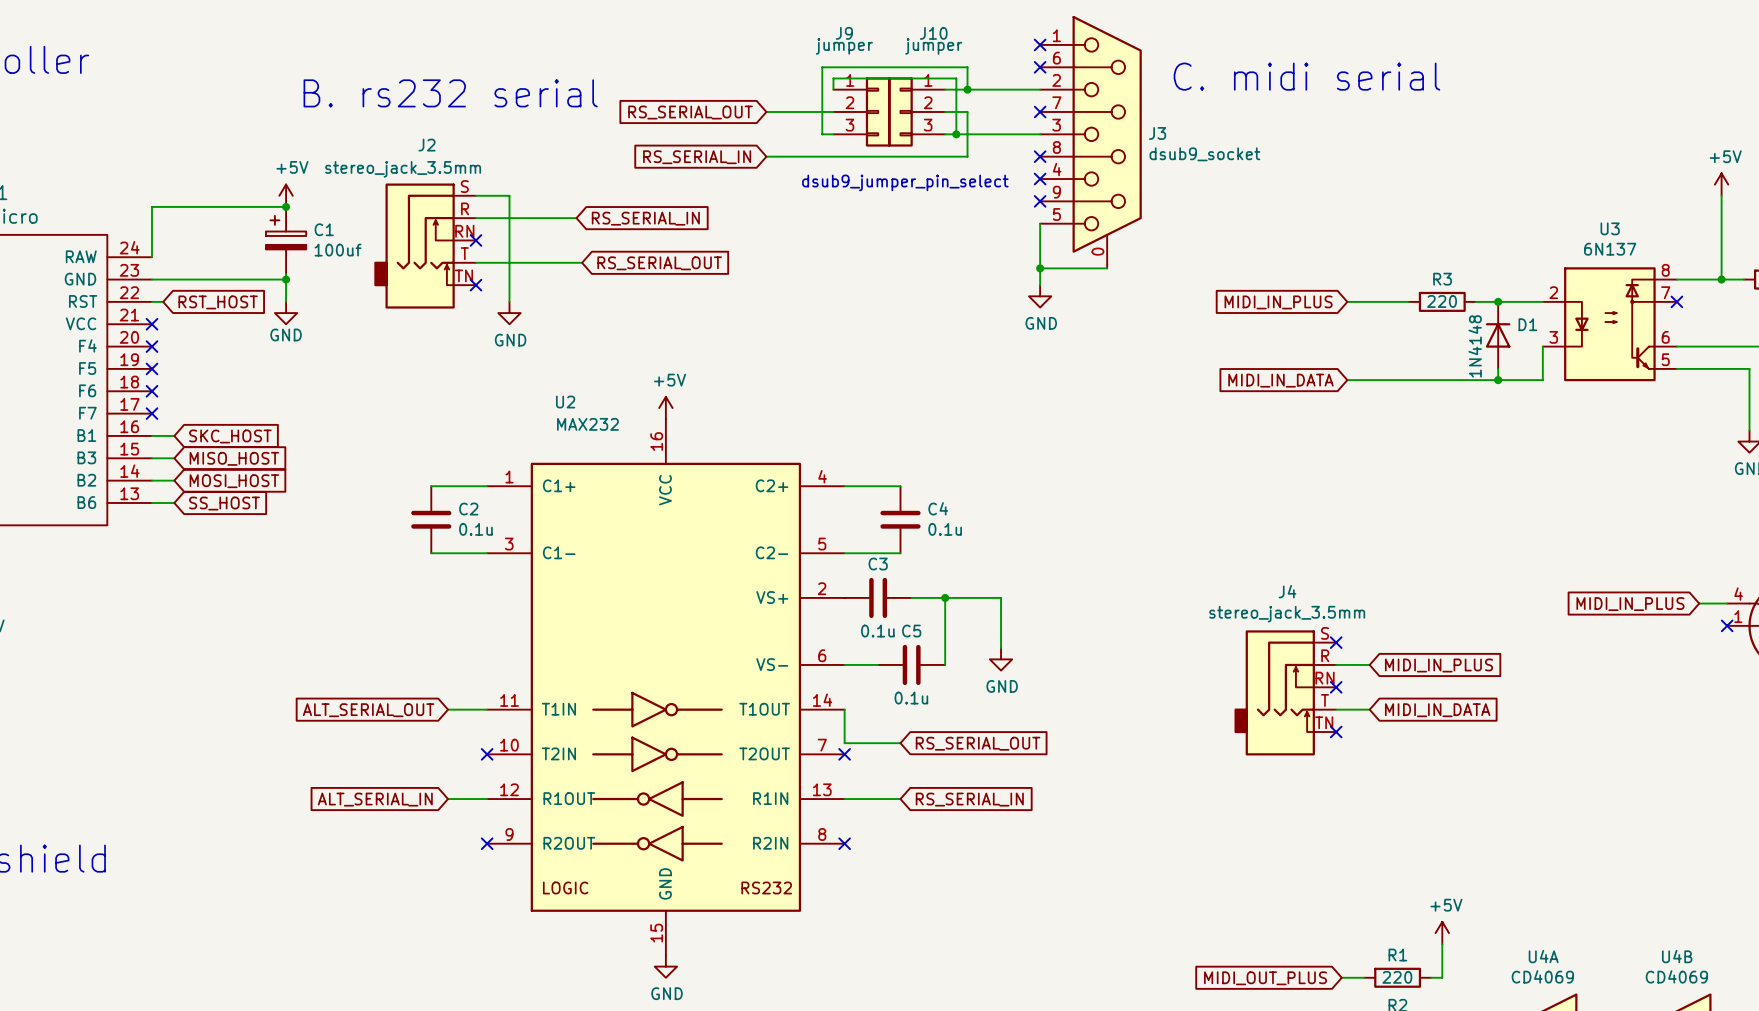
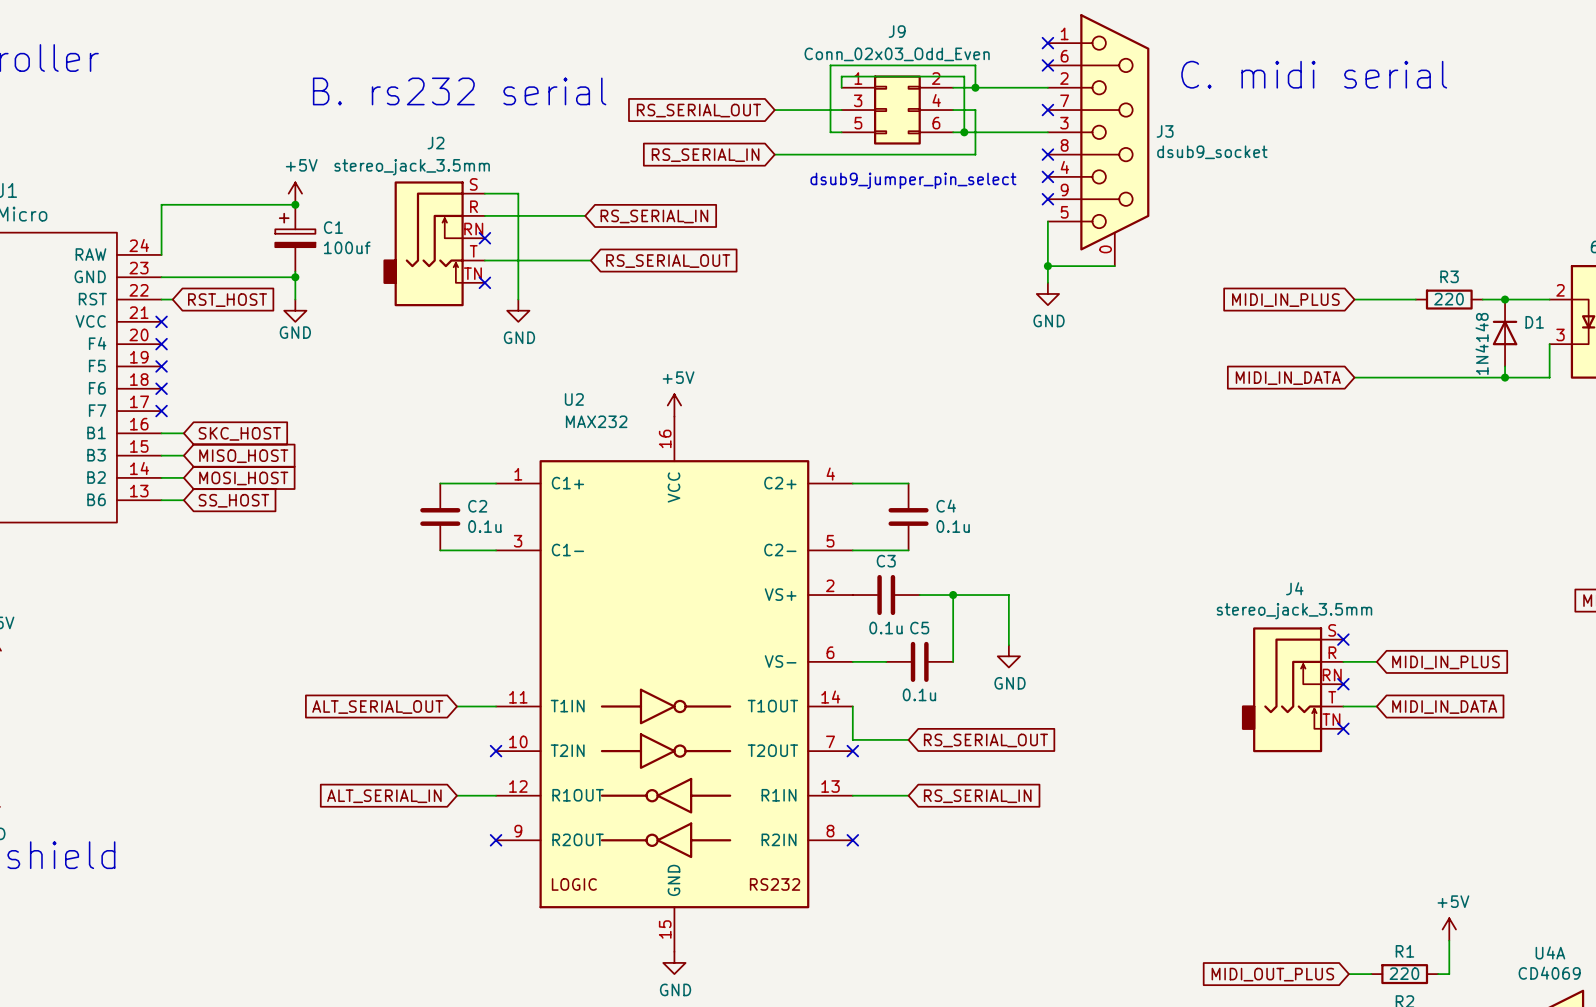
J9 value: jumper (844, 46) -> Conn_02x03_Odd_Even (897, 54)
J9 symbol: [833, 77, 891, 147] -> [841, 75, 954, 145]
J10: jumper (916, 111) -> none

